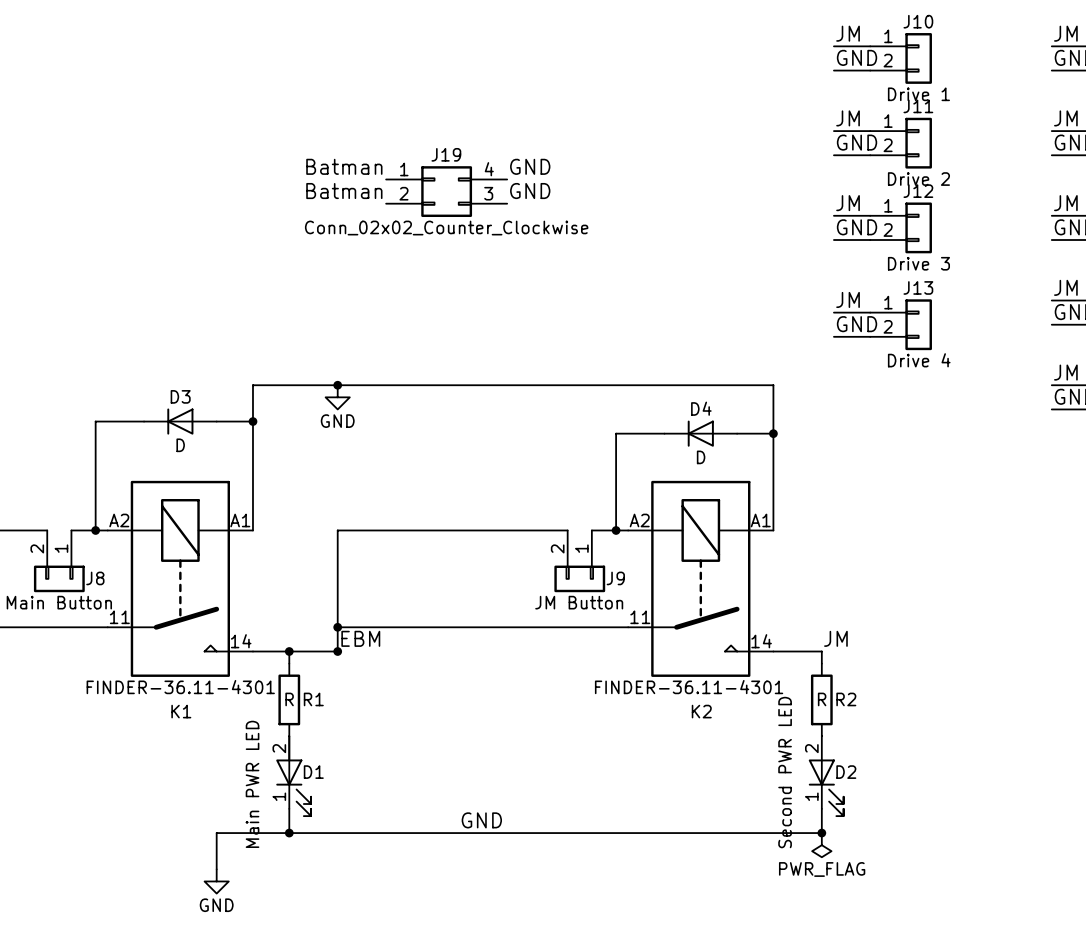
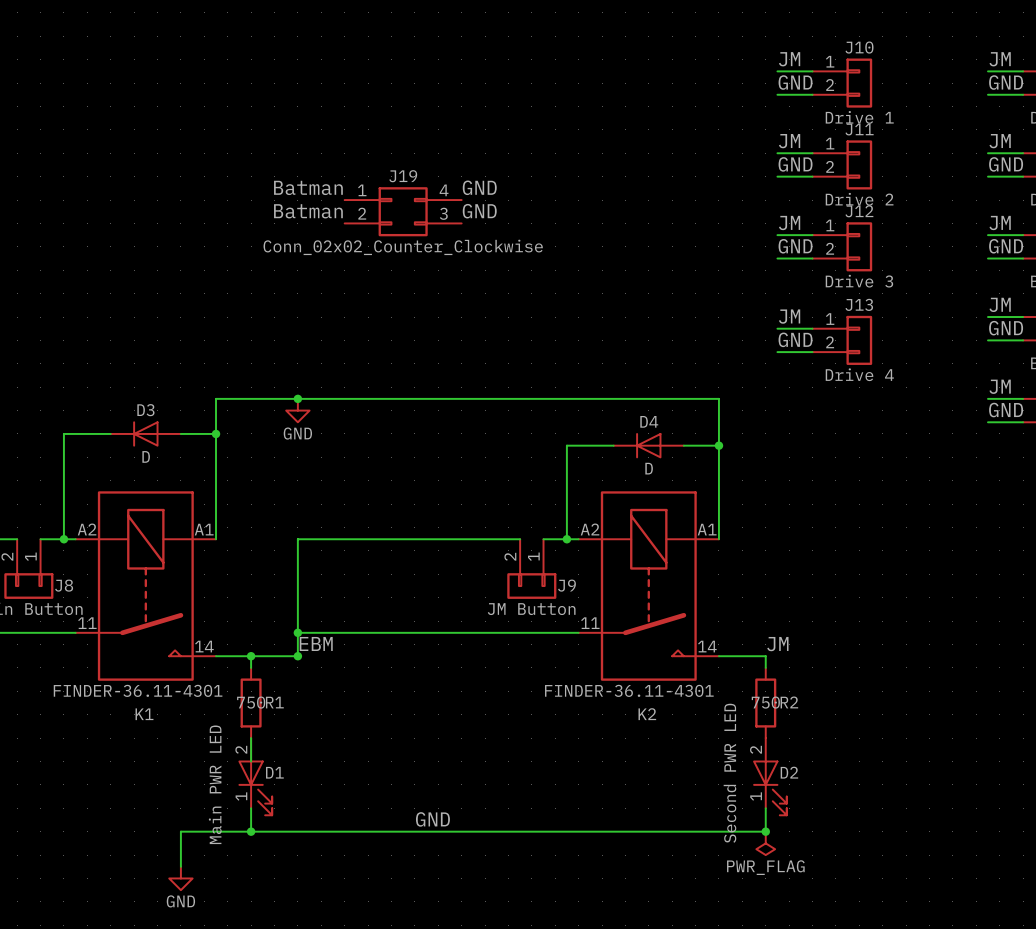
R1 value: R (289, 699) -> 750 (251, 702)
R2 value: R (822, 699) -> 750 (765, 702)

